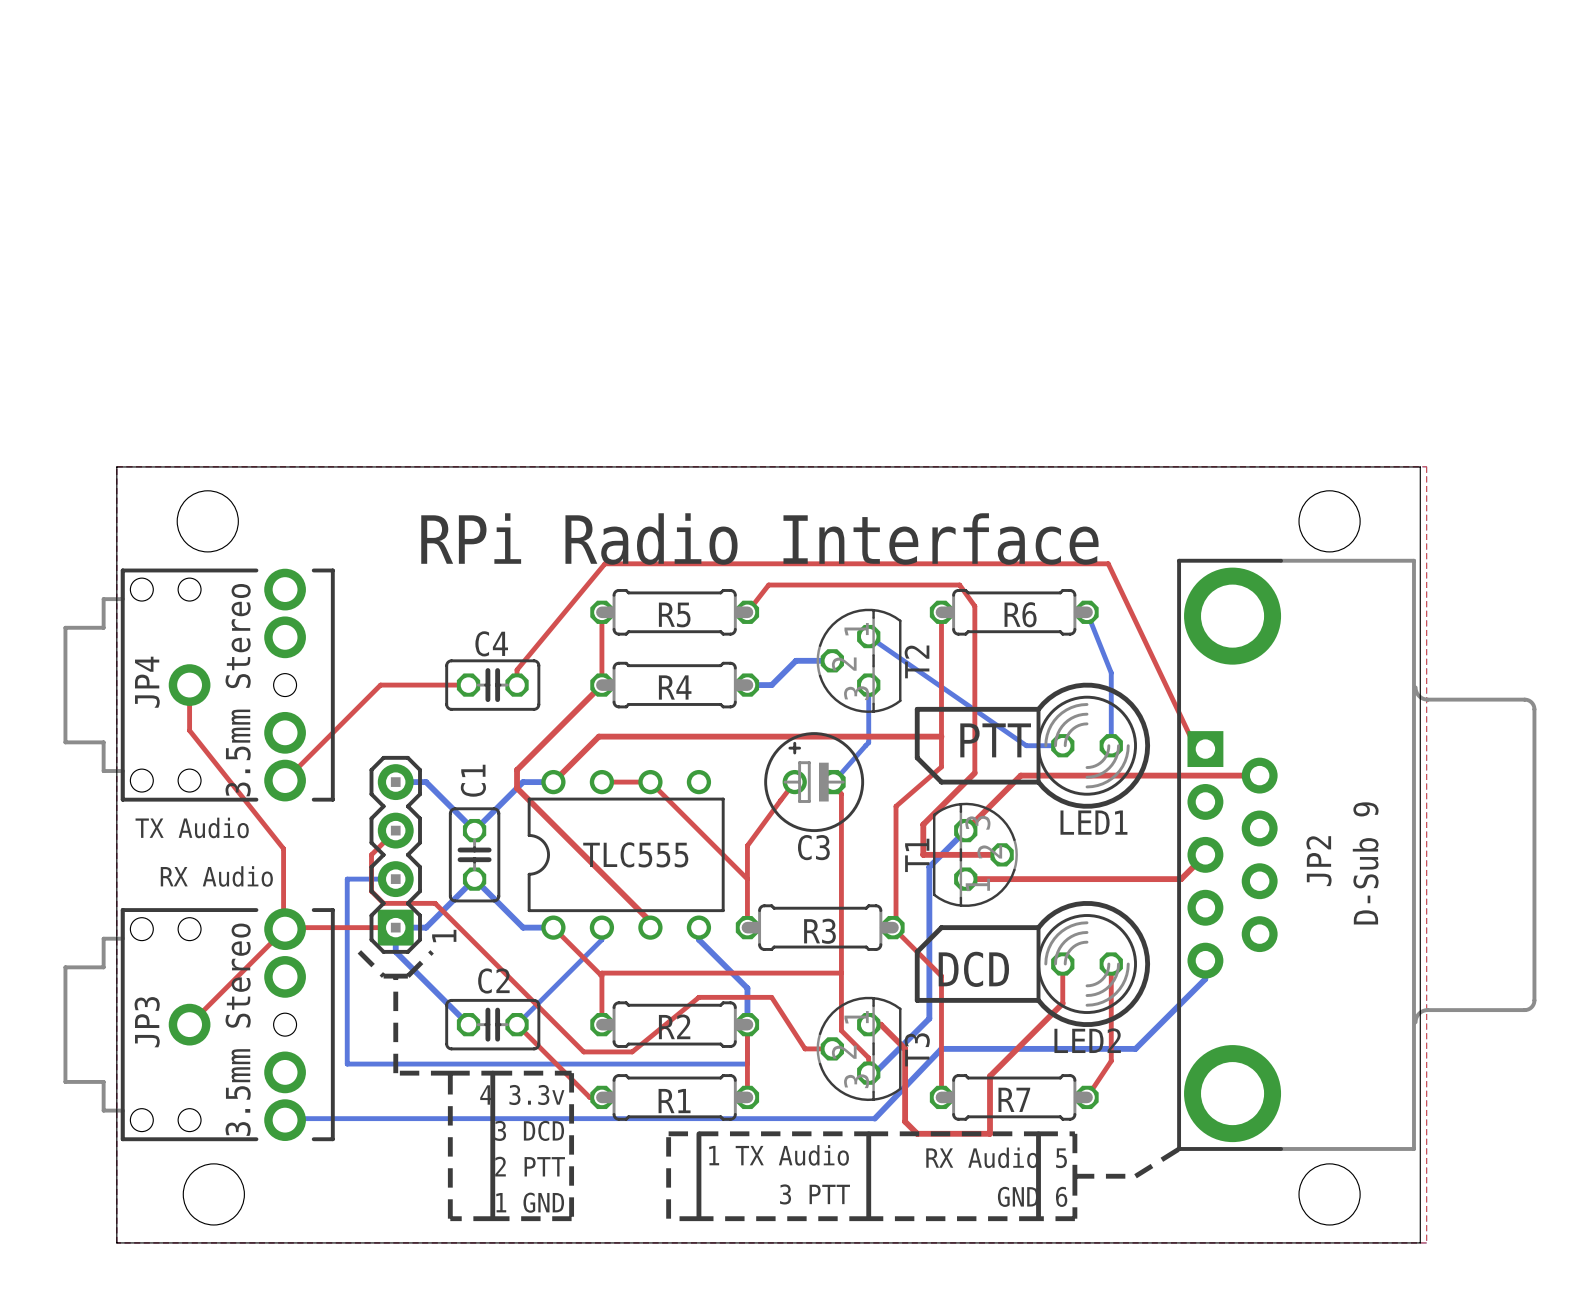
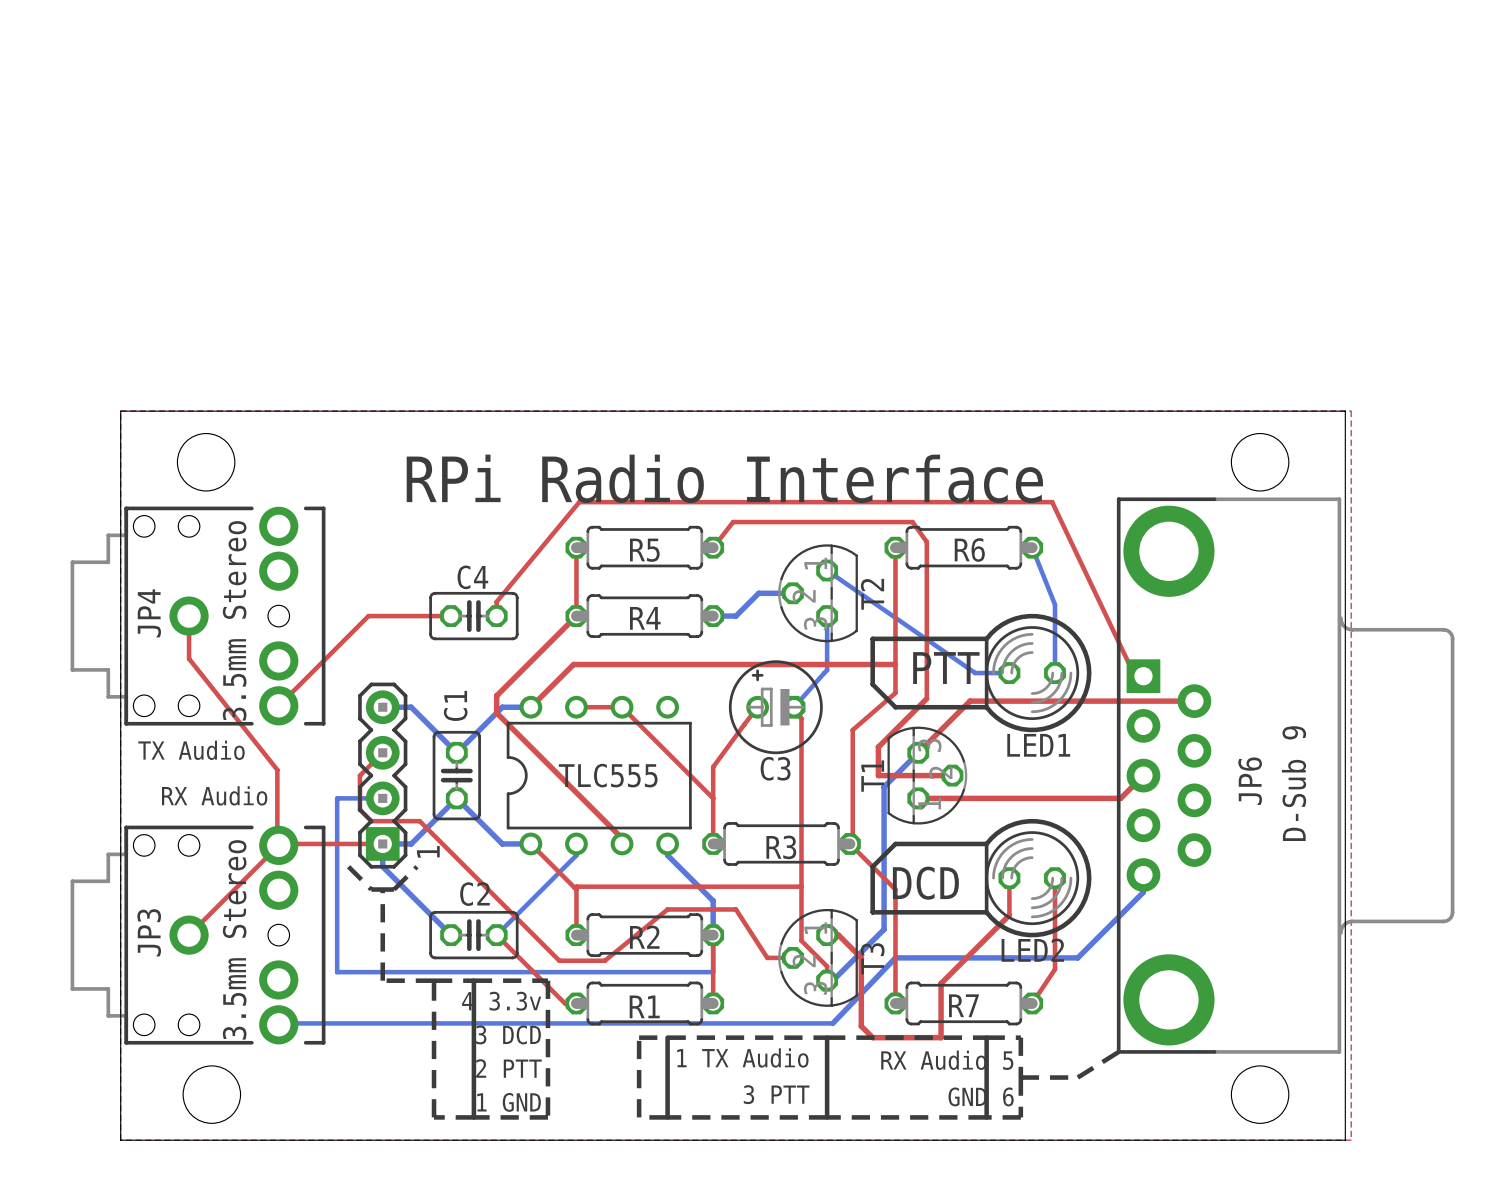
JP2 name: JP2 (1318, 861) -> JP6 (1250, 781)

